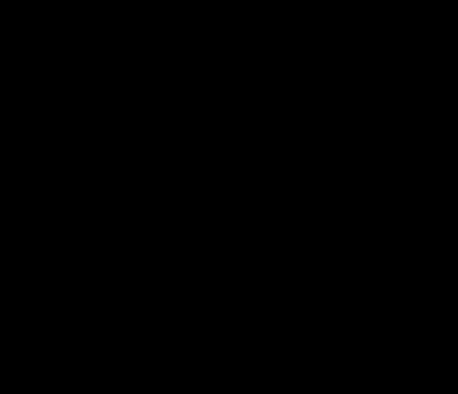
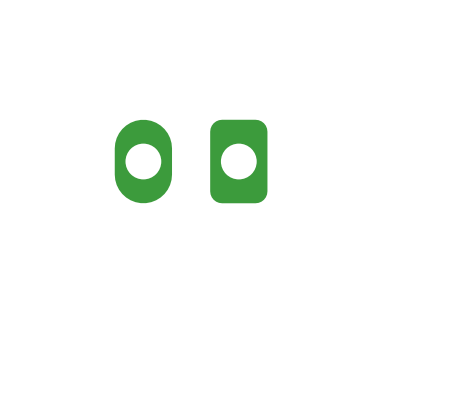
part: none -> (191, 161)

